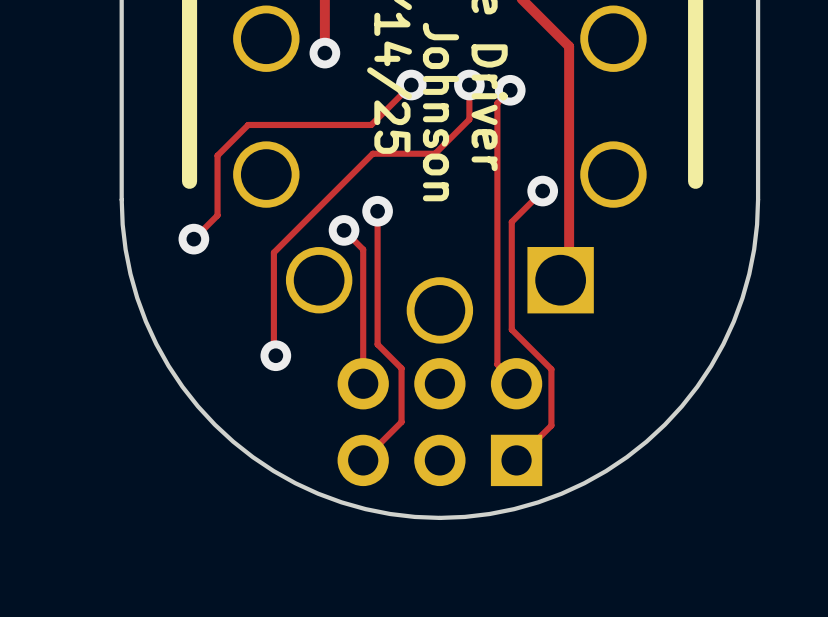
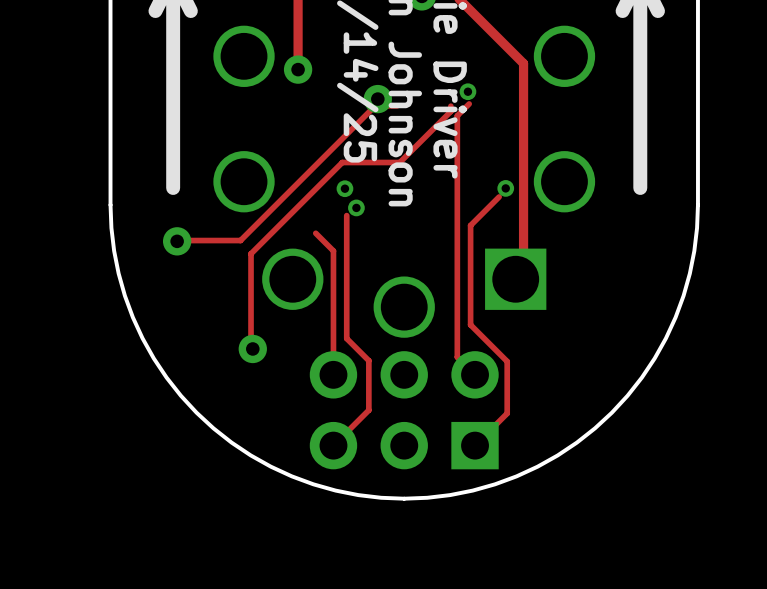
via size: [494, 74, 526, 106] -> [459, 83, 477, 101]
track: (411, 85) (371, 124) (248, 124) (217, 155) (217, 215) (194, 238) -> (397, 105) (375, 105) (240, 240) (177, 240)
track: (469, 85) (469, 119) -> (450, 106) (450, 111) (431, 130)
via: (469, 85) -> none
via size: [527, 175, 559, 207] -> [497, 180, 515, 197]
via: none -> (344, 188)
via size: [362, 195, 393, 227] -> [348, 199, 365, 217]
via: (344, 230) -> none

